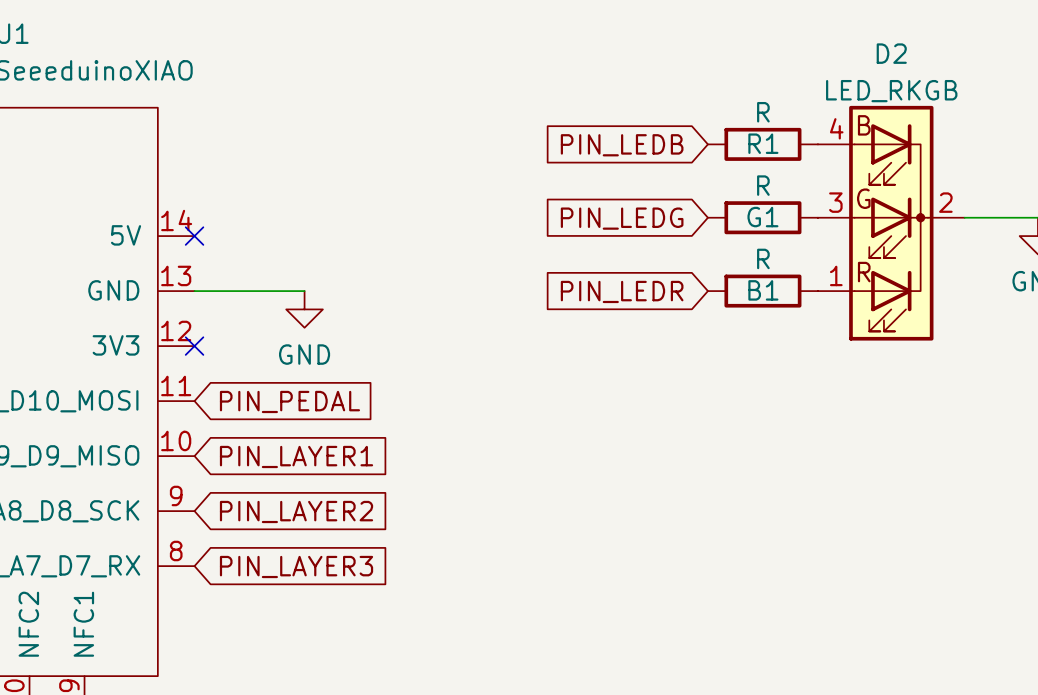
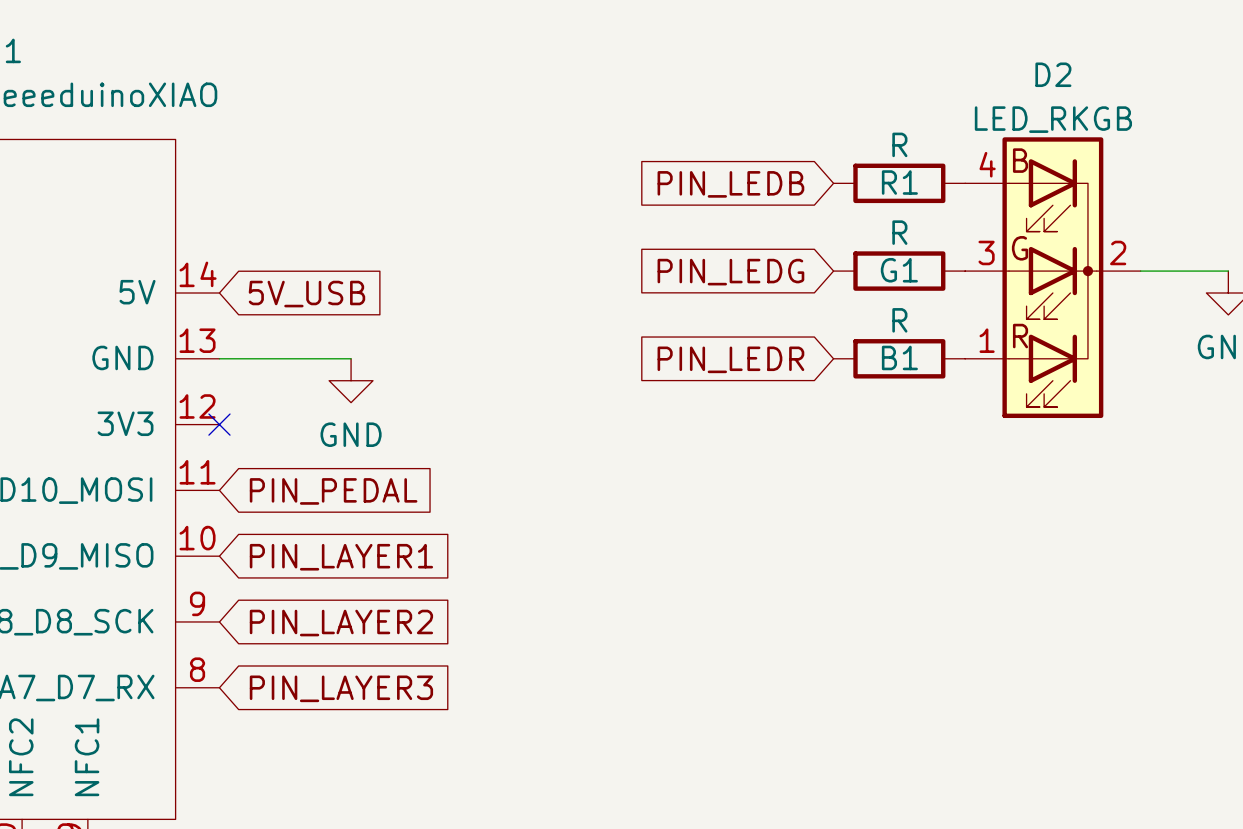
no-connect mark: (194, 236) -> none
global label: none -> 5V_USB (306, 294)

